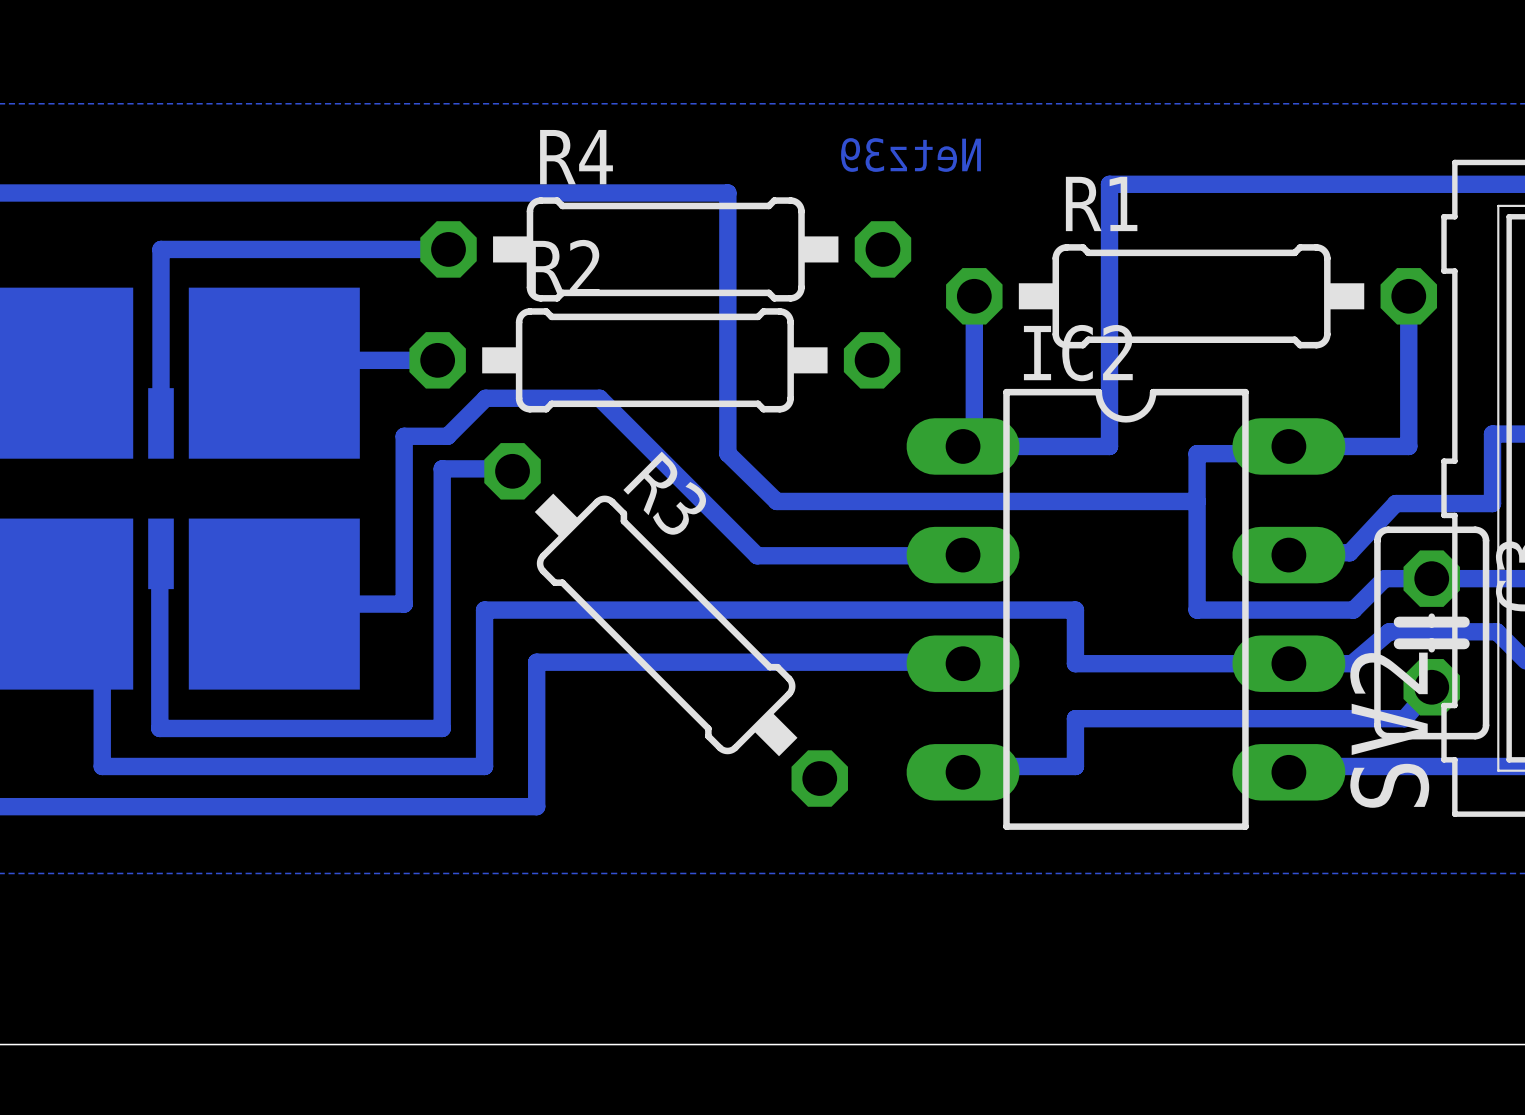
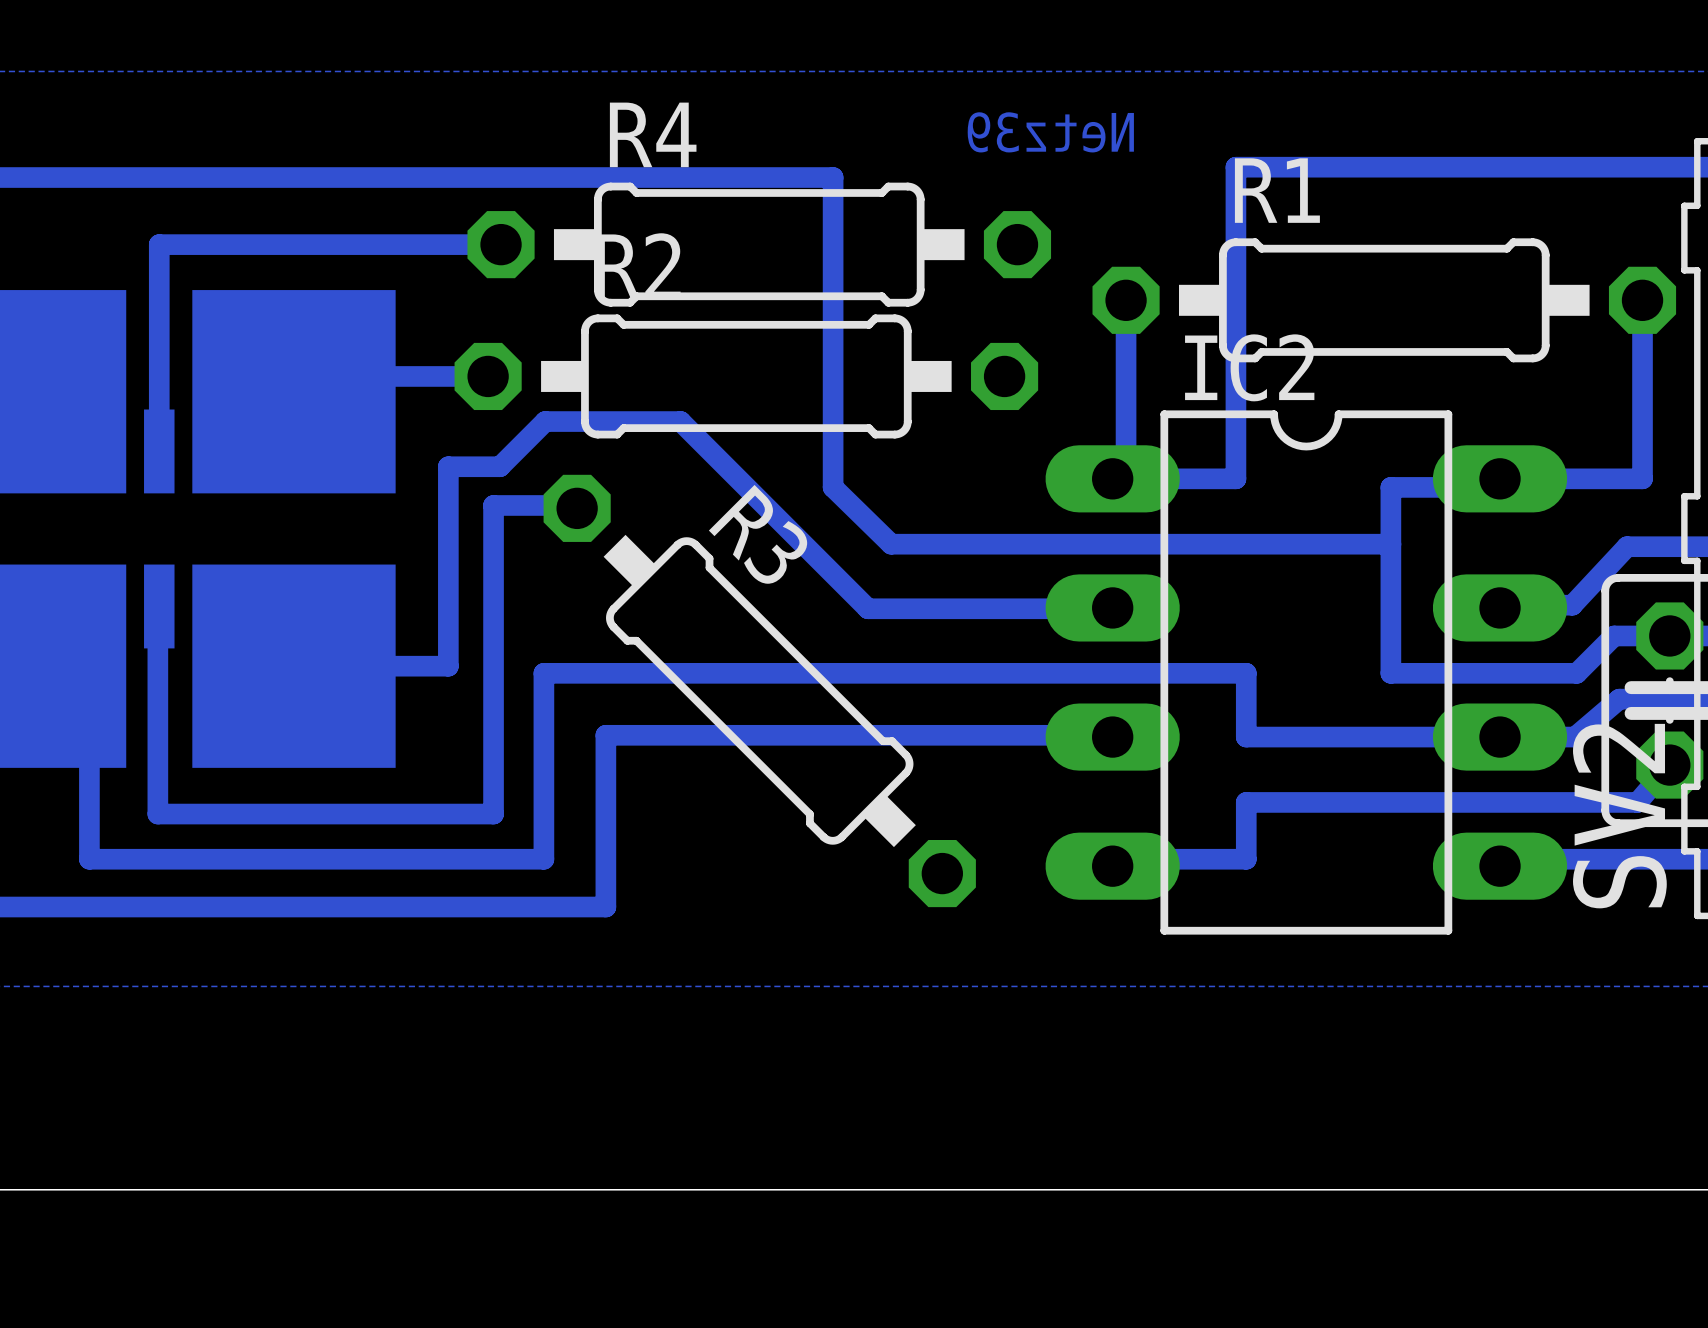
bottom track: (1109, 184) (1109, 446) (1066, 446) -> (1286, 167) (1235, 167) (1235, 478)

